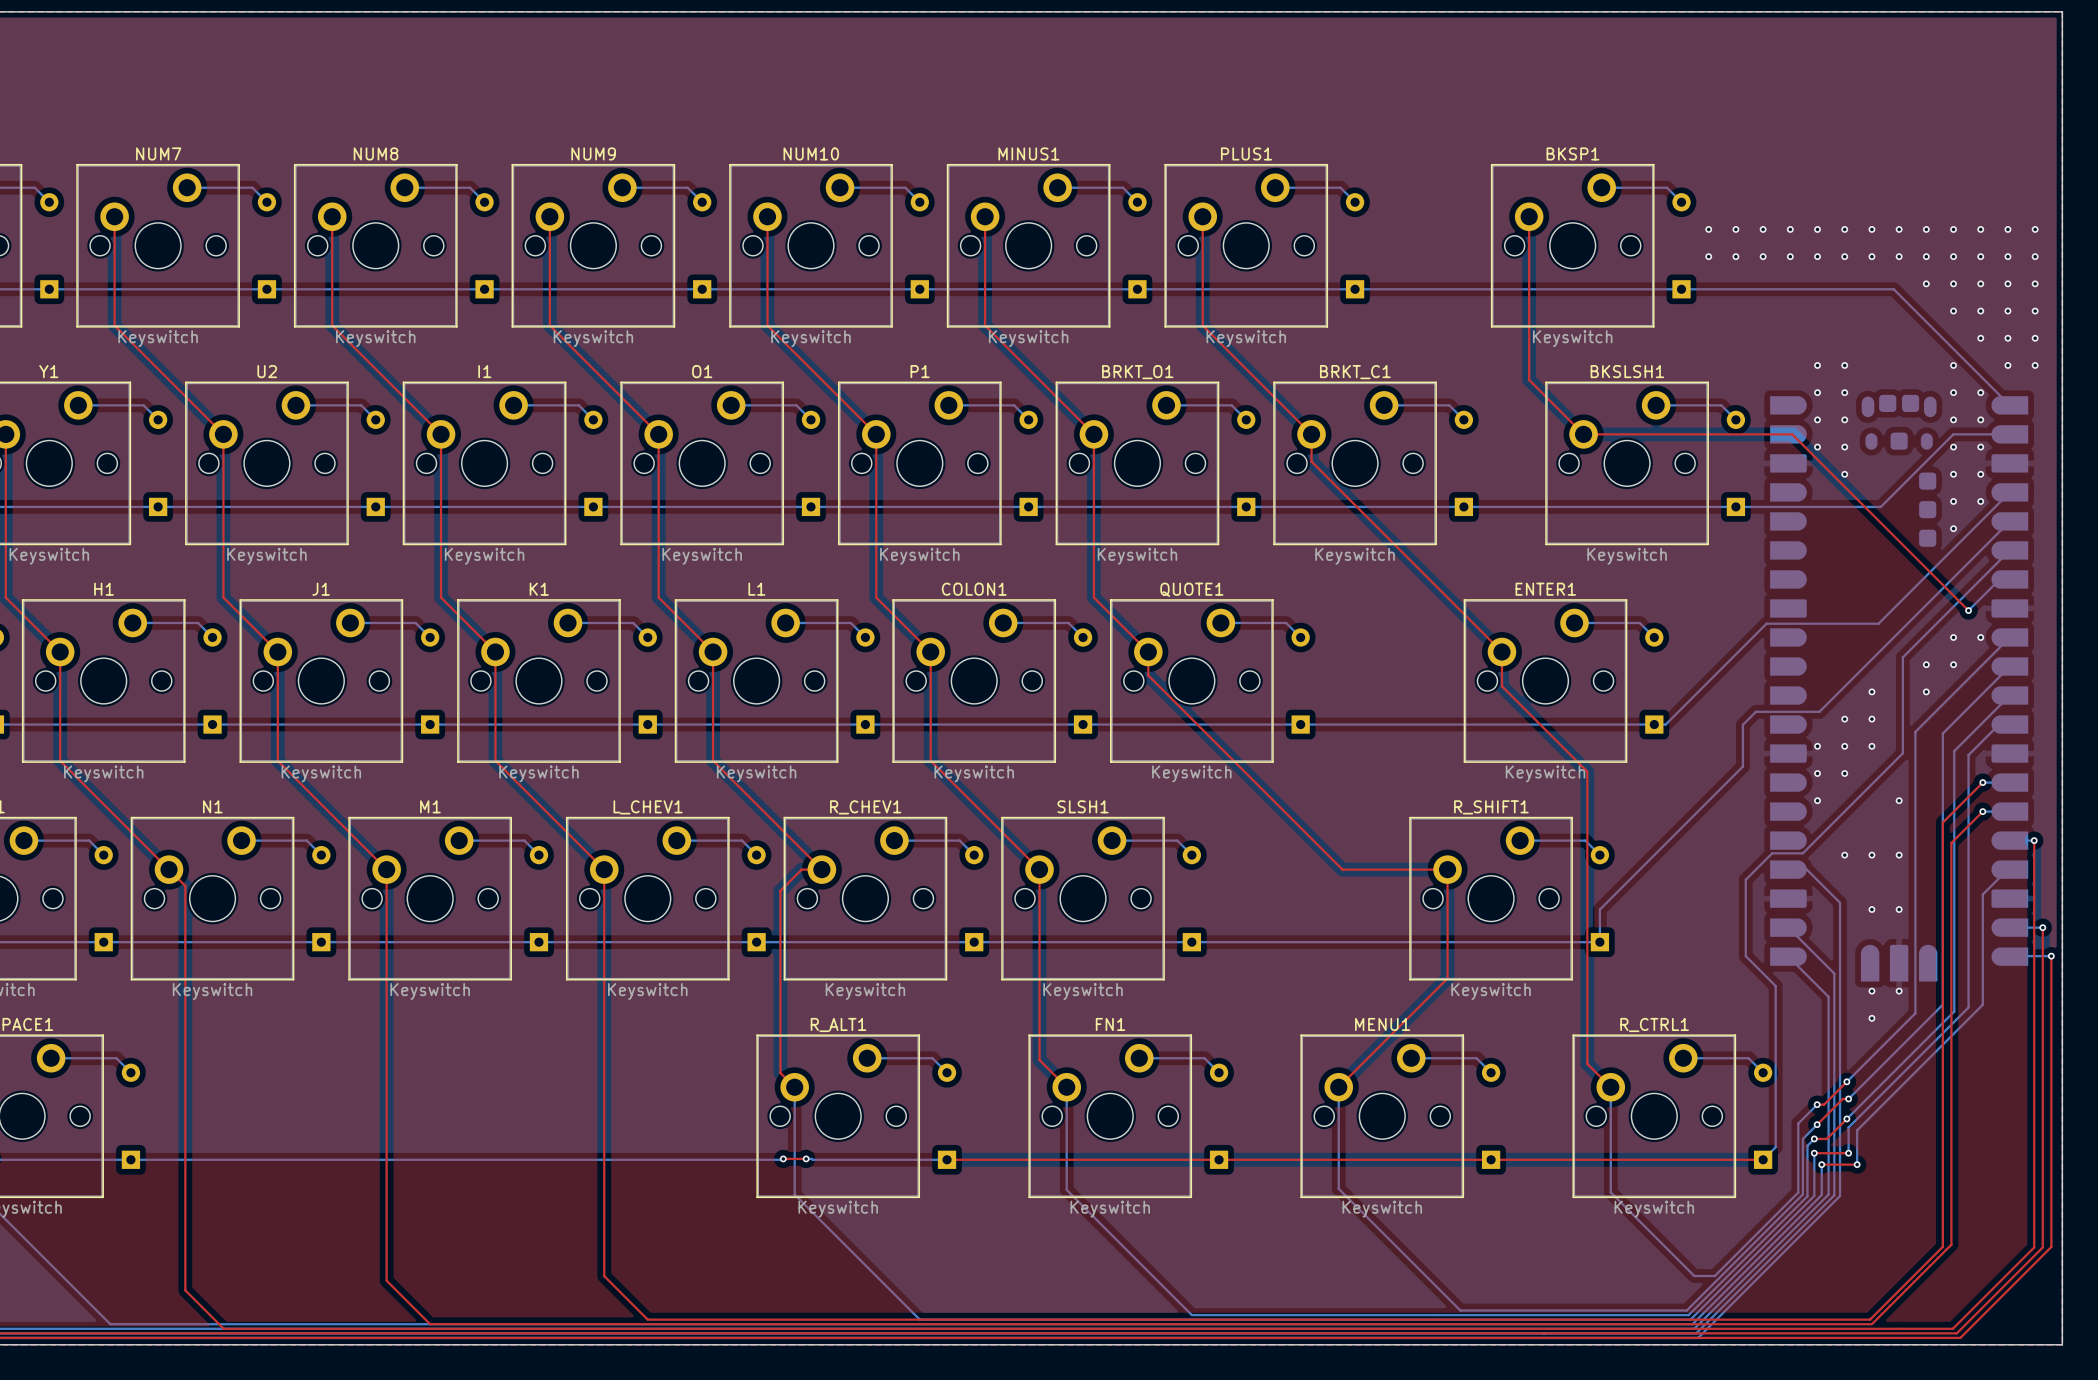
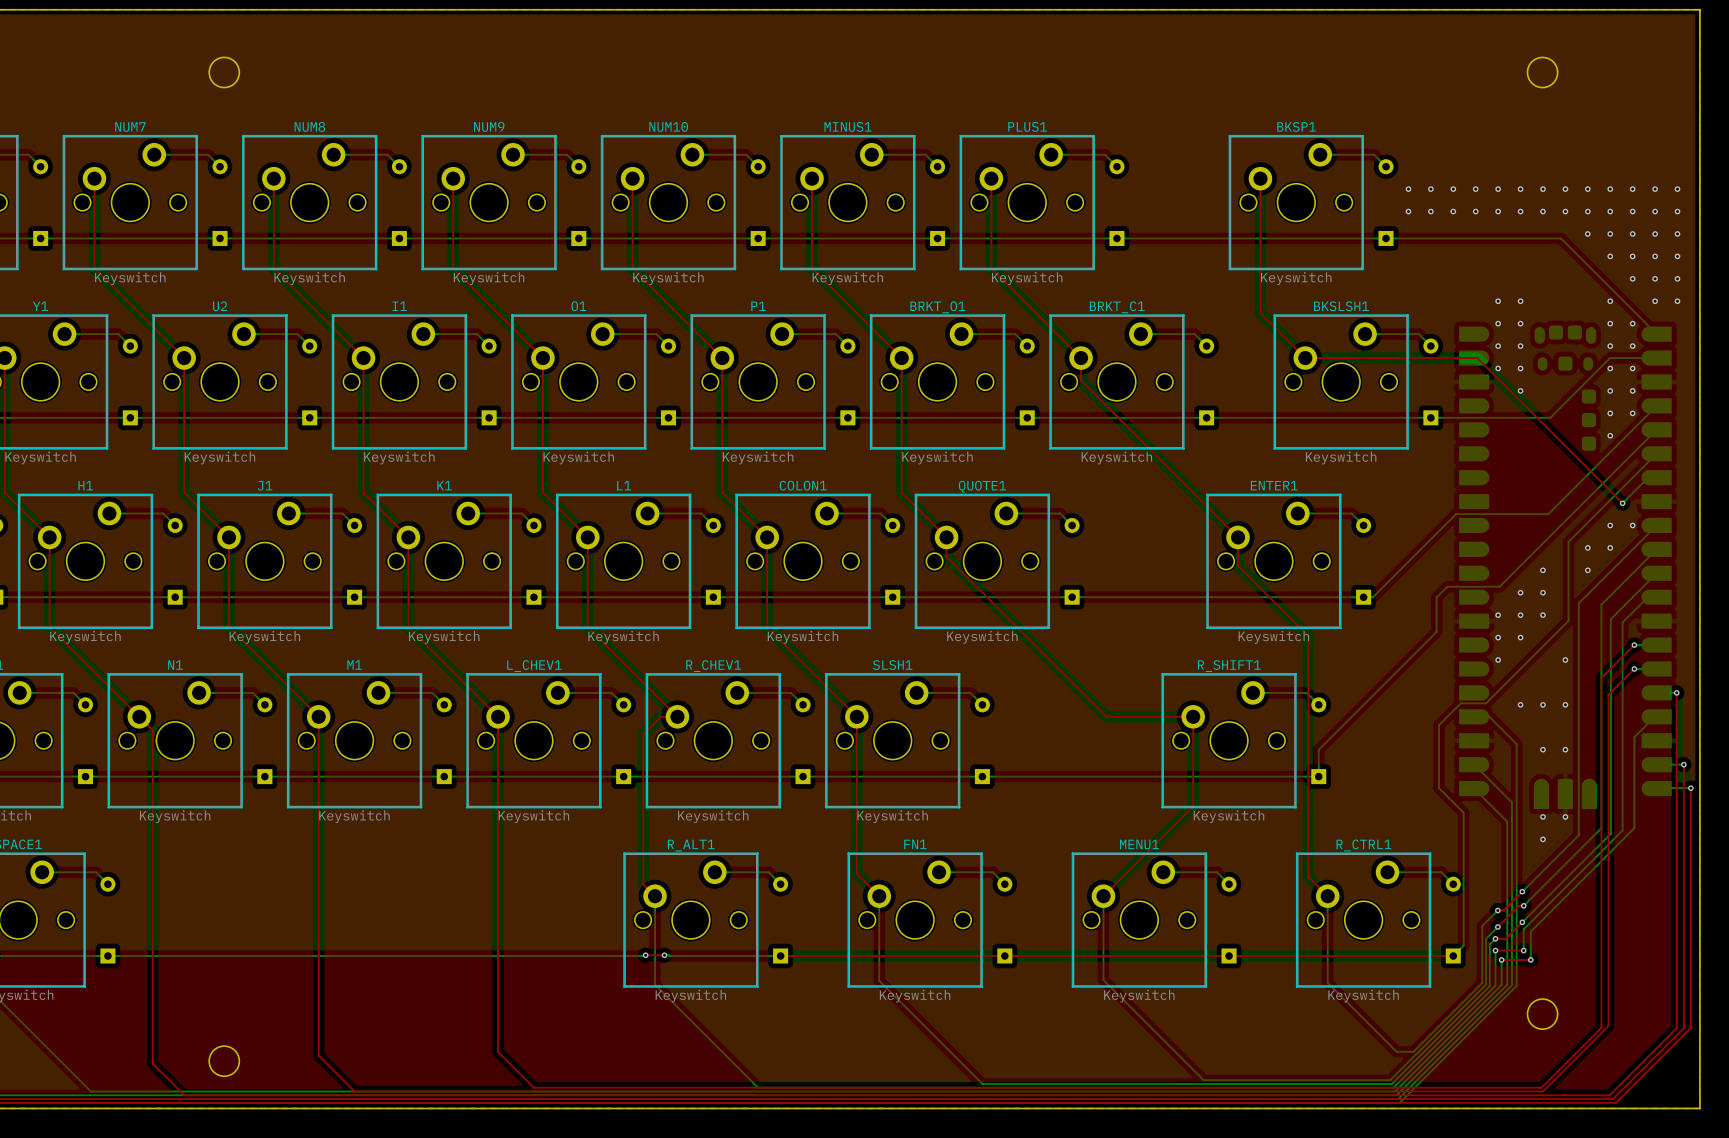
round board edge: none -> [208, 57, 240, 88]
round board edge: none -> [1527, 57, 1558, 88]
round board edge: none -> [1527, 998, 1558, 1030]
round board edge: none -> [208, 1045, 240, 1077]

